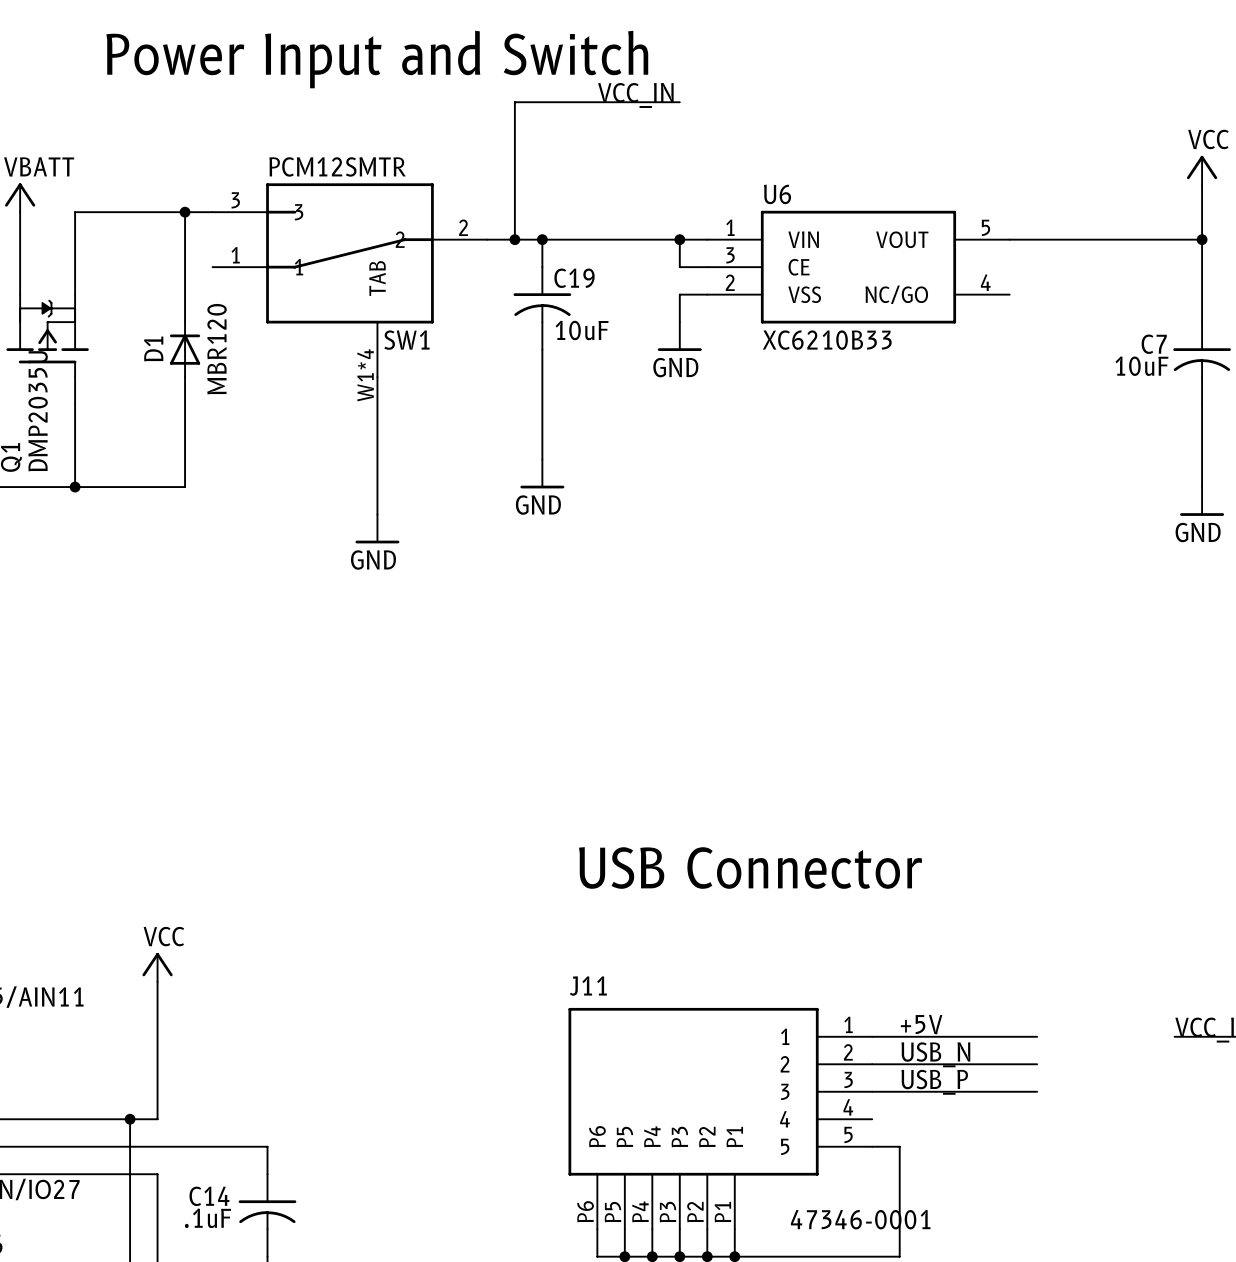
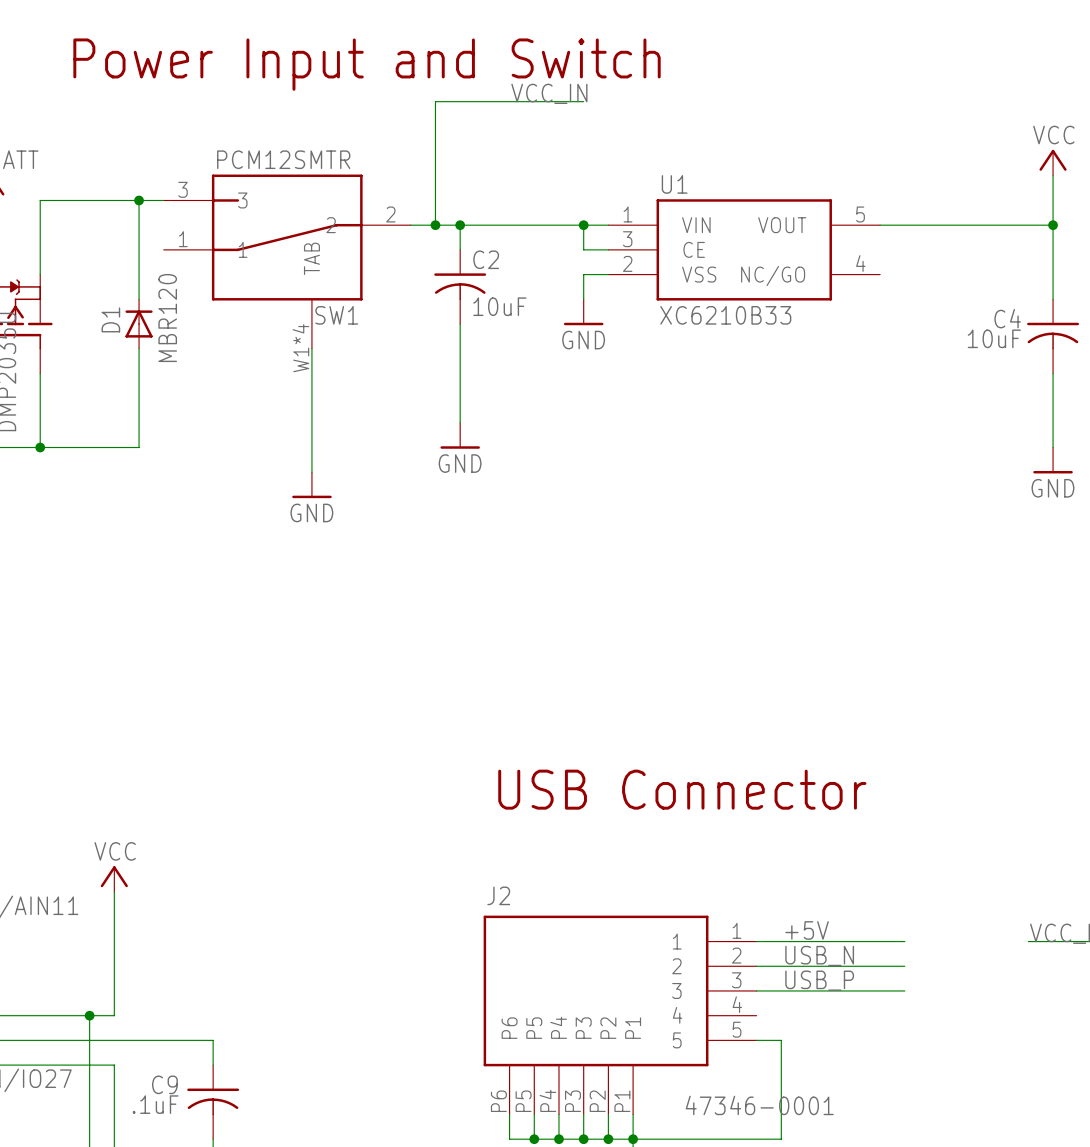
U6 name: U6 (777, 194) -> U1 (674, 184)
C19 name: C19 (574, 278) -> C2 (486, 259)
C7 name: C7 (1154, 344) -> C4 (1007, 318)
J11 name: J11 (588, 986) -> J2 (498, 895)
C14 name: C14 (209, 1196) -> C9 (164, 1084)

